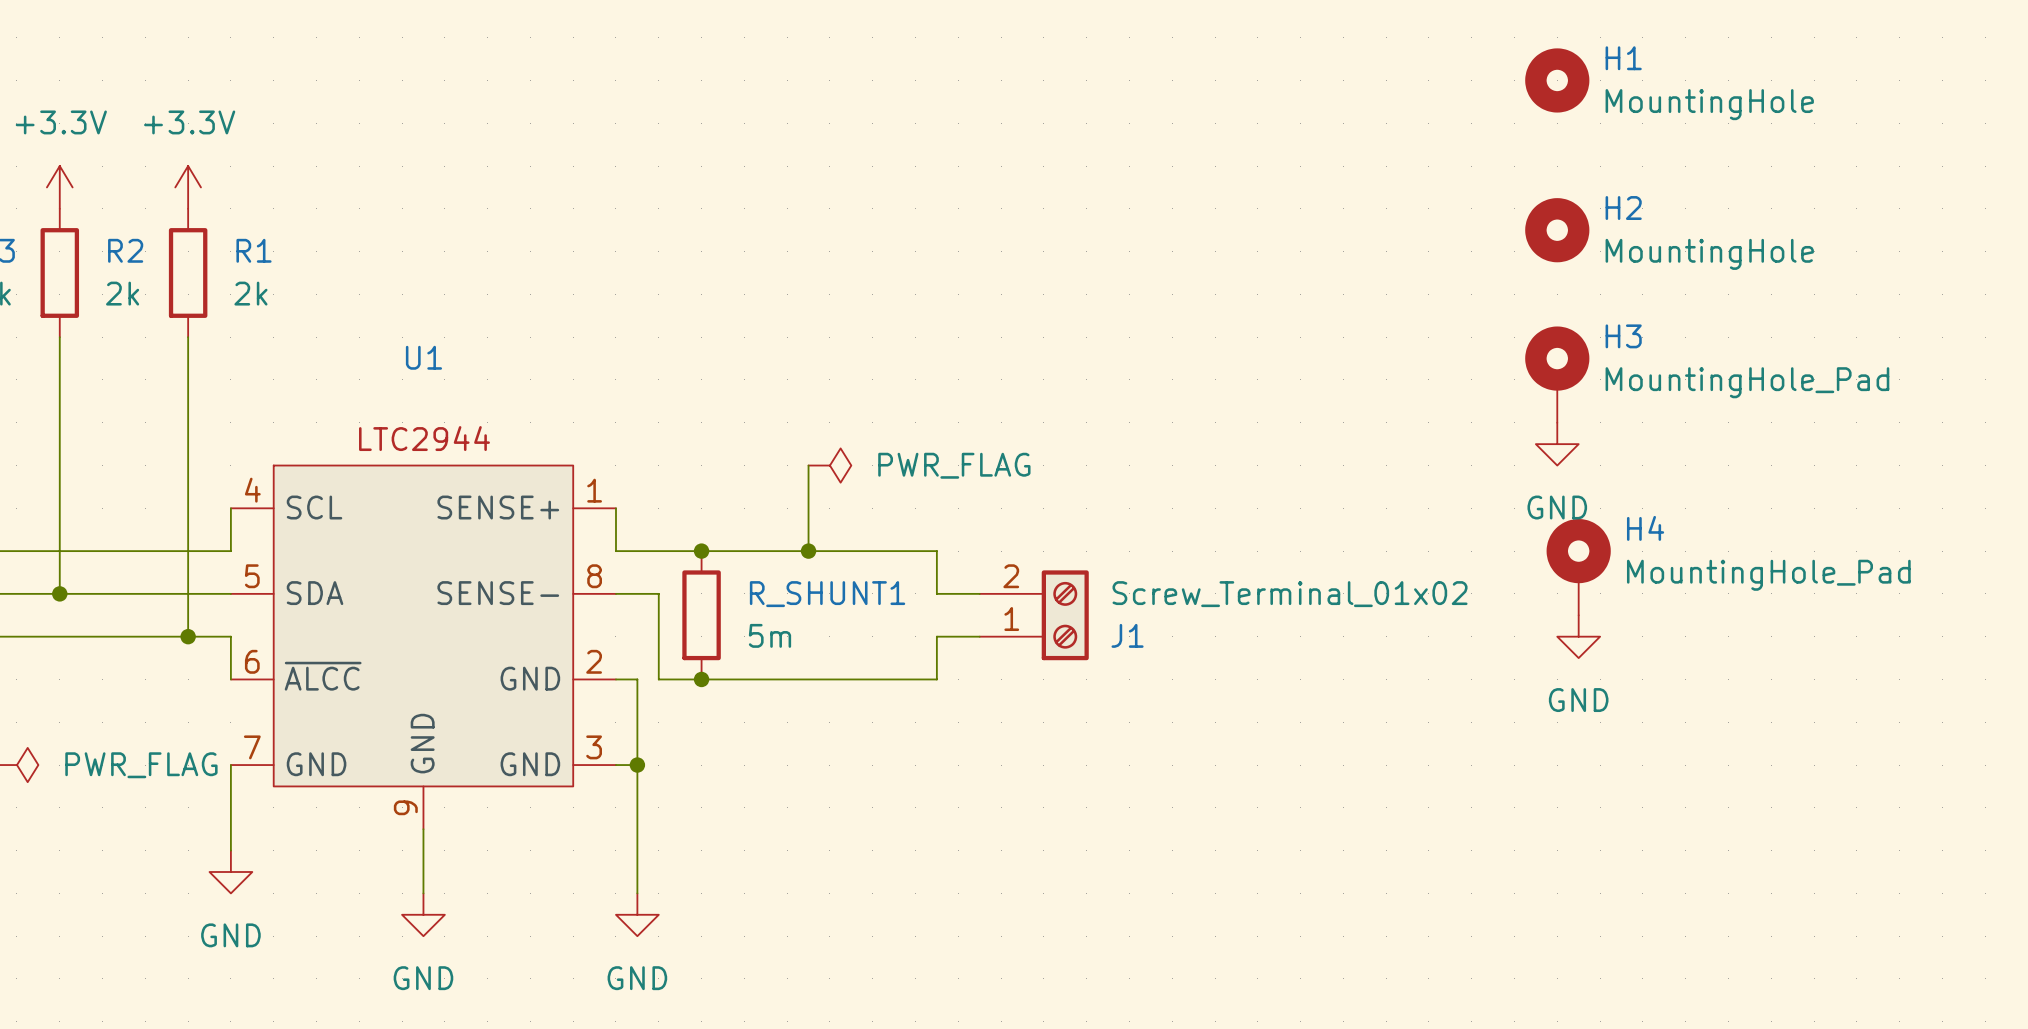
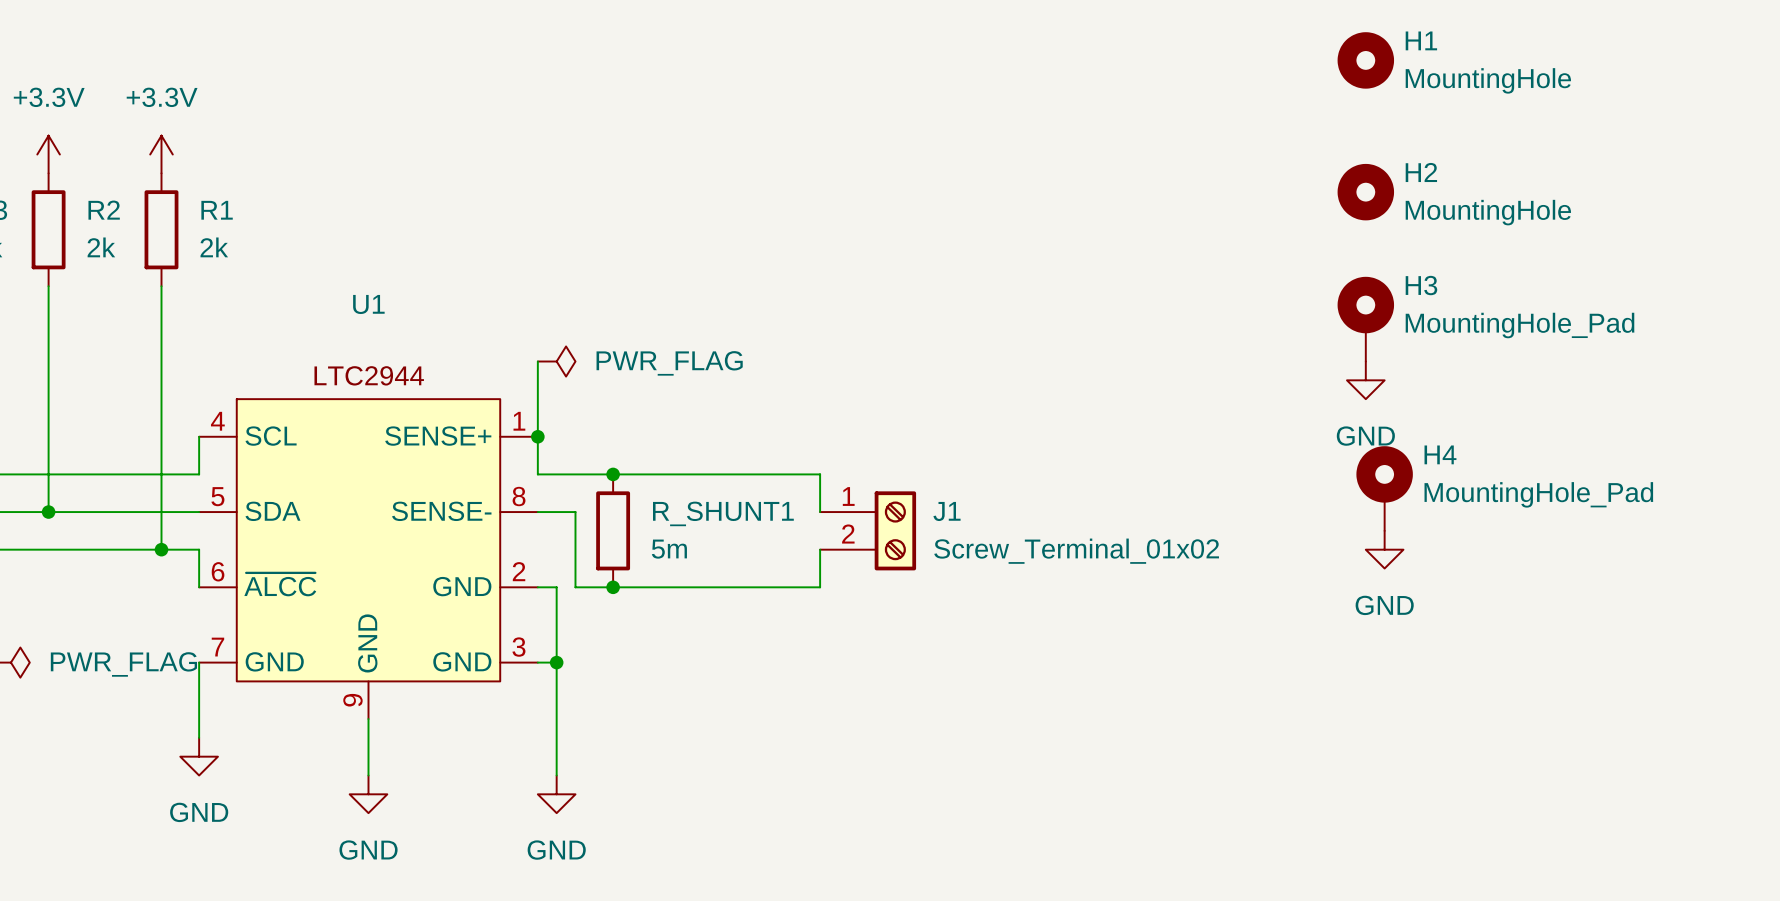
wire: (808, 465) (808, 551) -> (537, 361) (537, 436)
power symbol position: PWR_FLAG (829, 465) -> PWR_FLAG (556, 361)
junction: none -> (537, 436)
junction: (808, 551) -> none
J1 flip: as is (1065, 615) -> up-down (895, 530)

